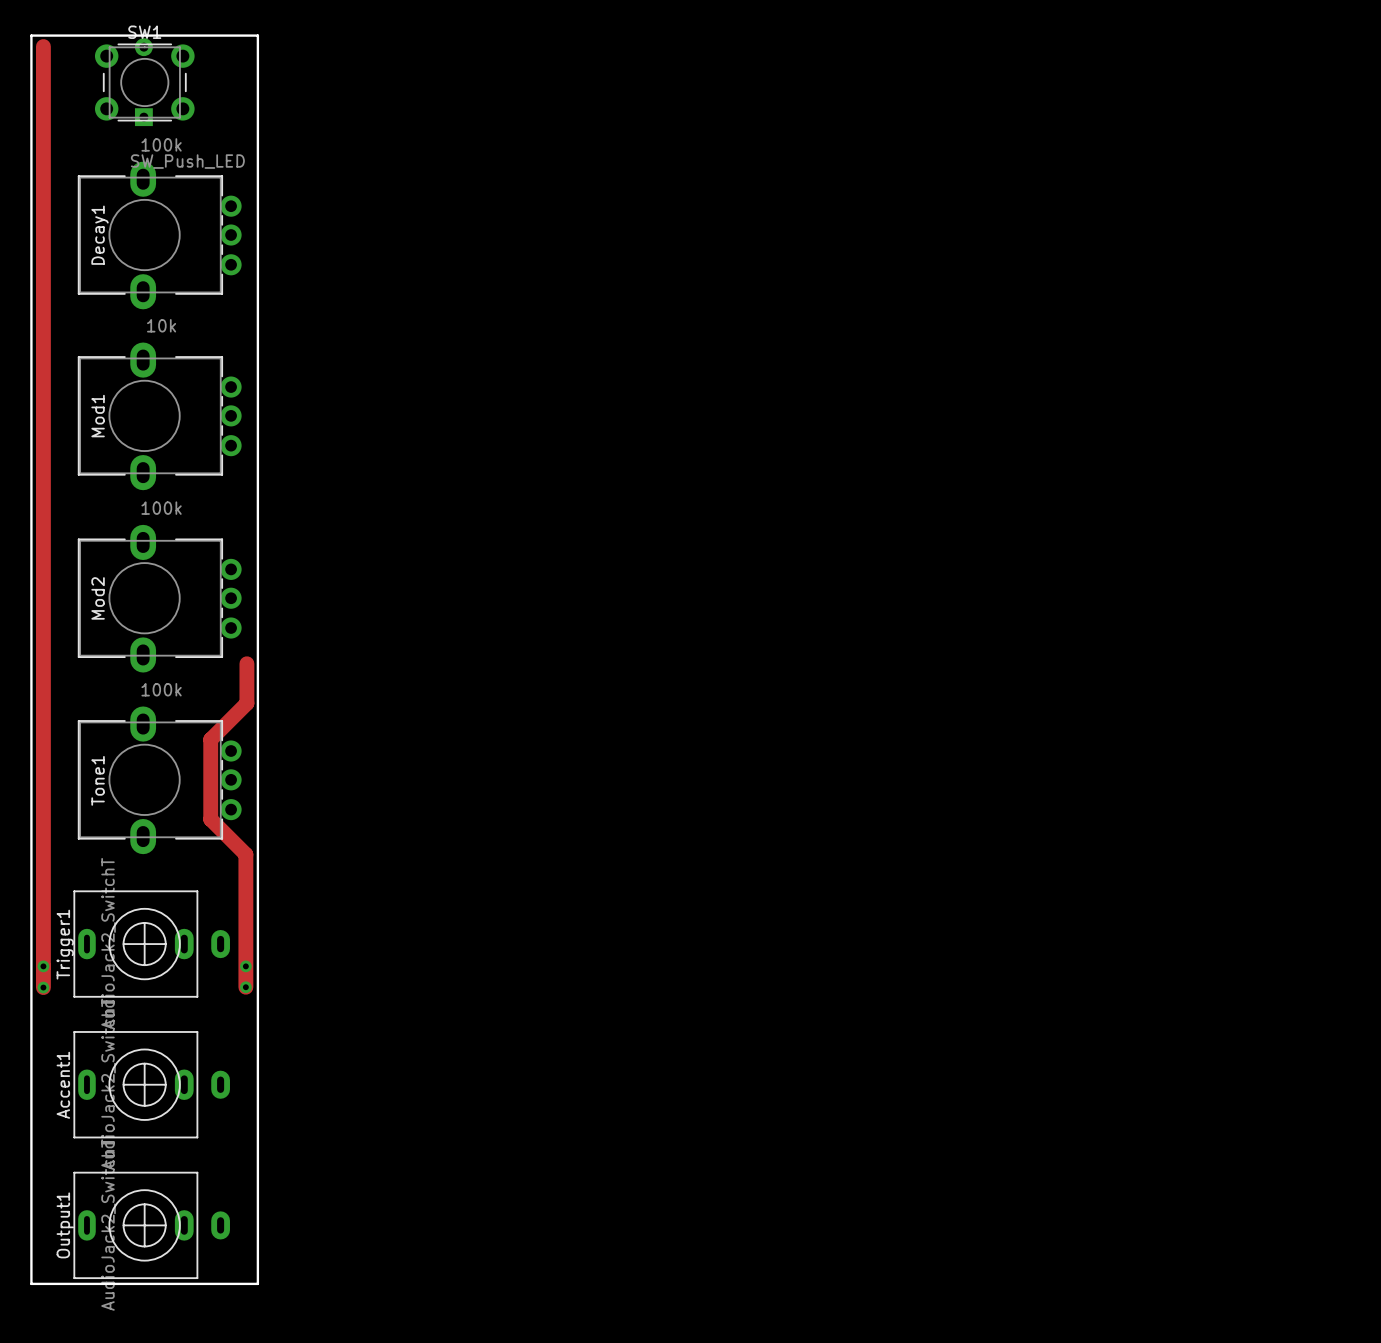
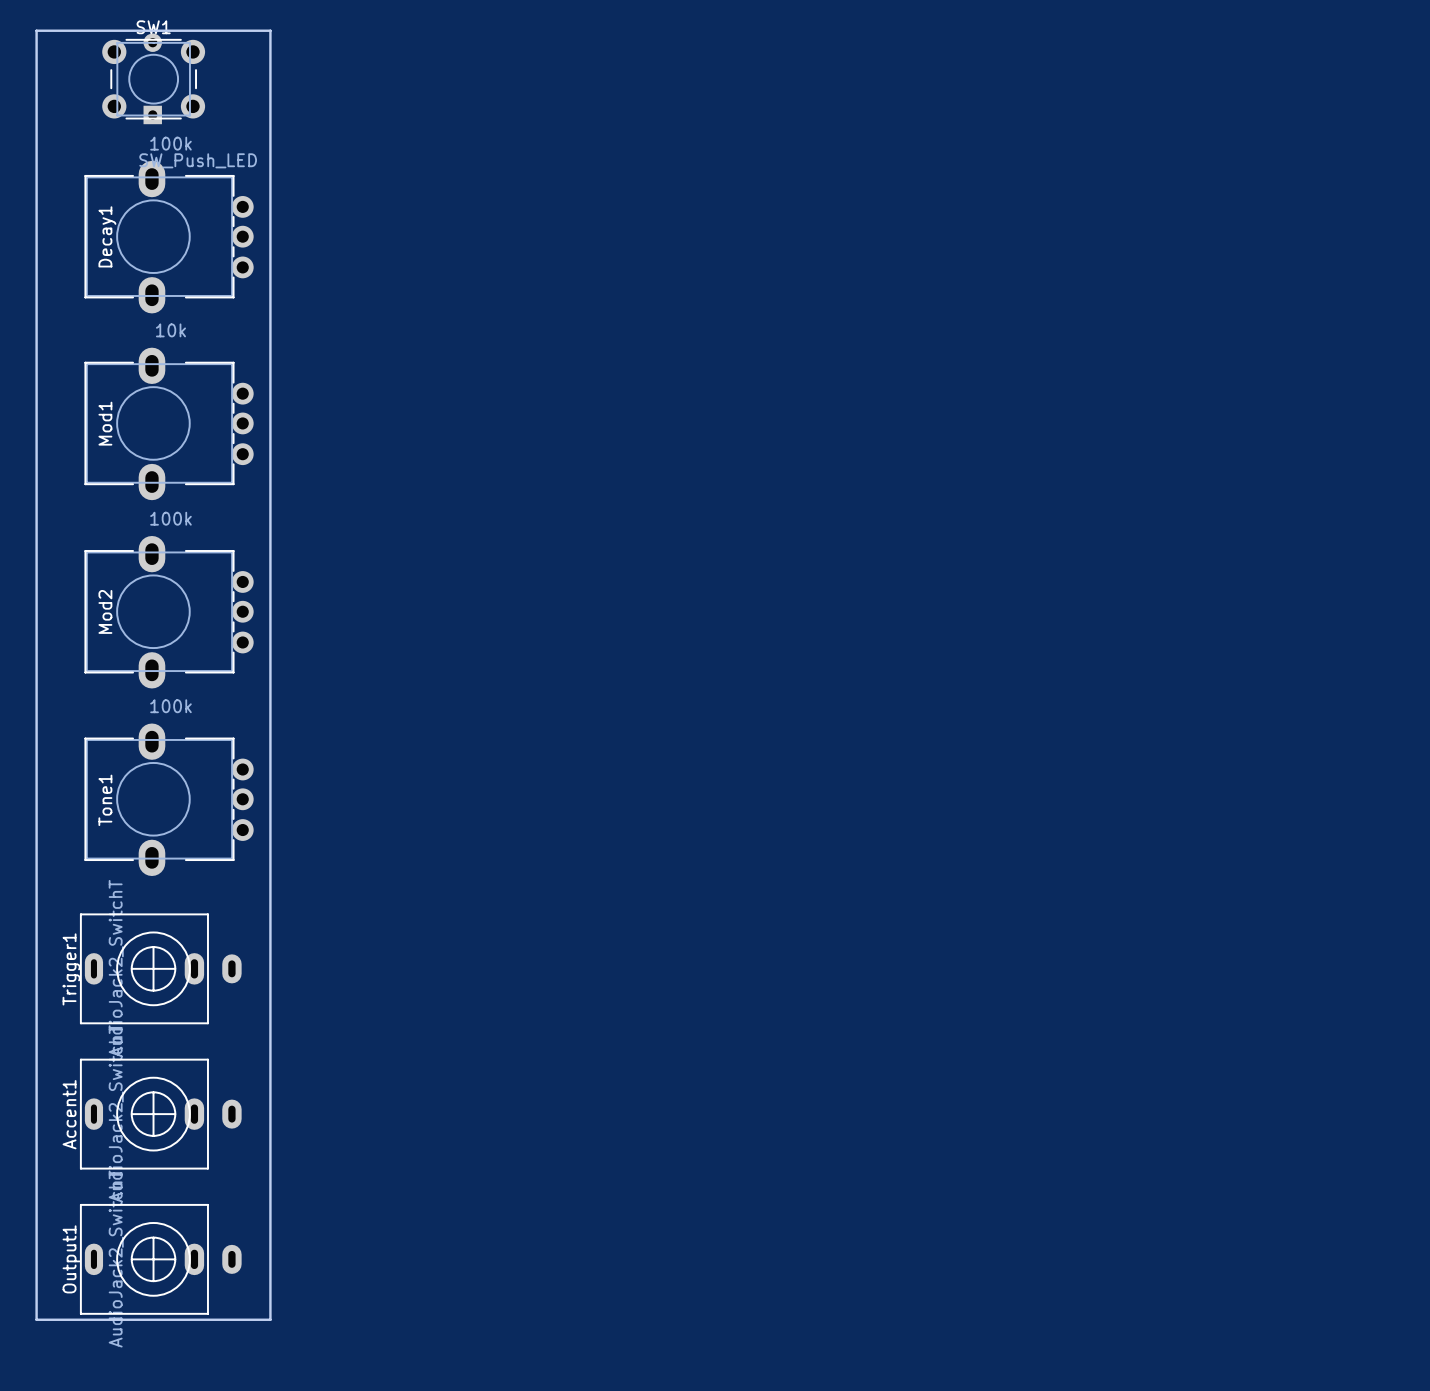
track: (43, 46) (43, 987) -> none
track: (246, 663) (246, 703) (210, 739) (210, 819) (245, 854) (245, 987) -> none
via: (43, 966) -> none
via: (245, 966) -> none
via: (43, 987) -> none
via: (245, 987) -> none

